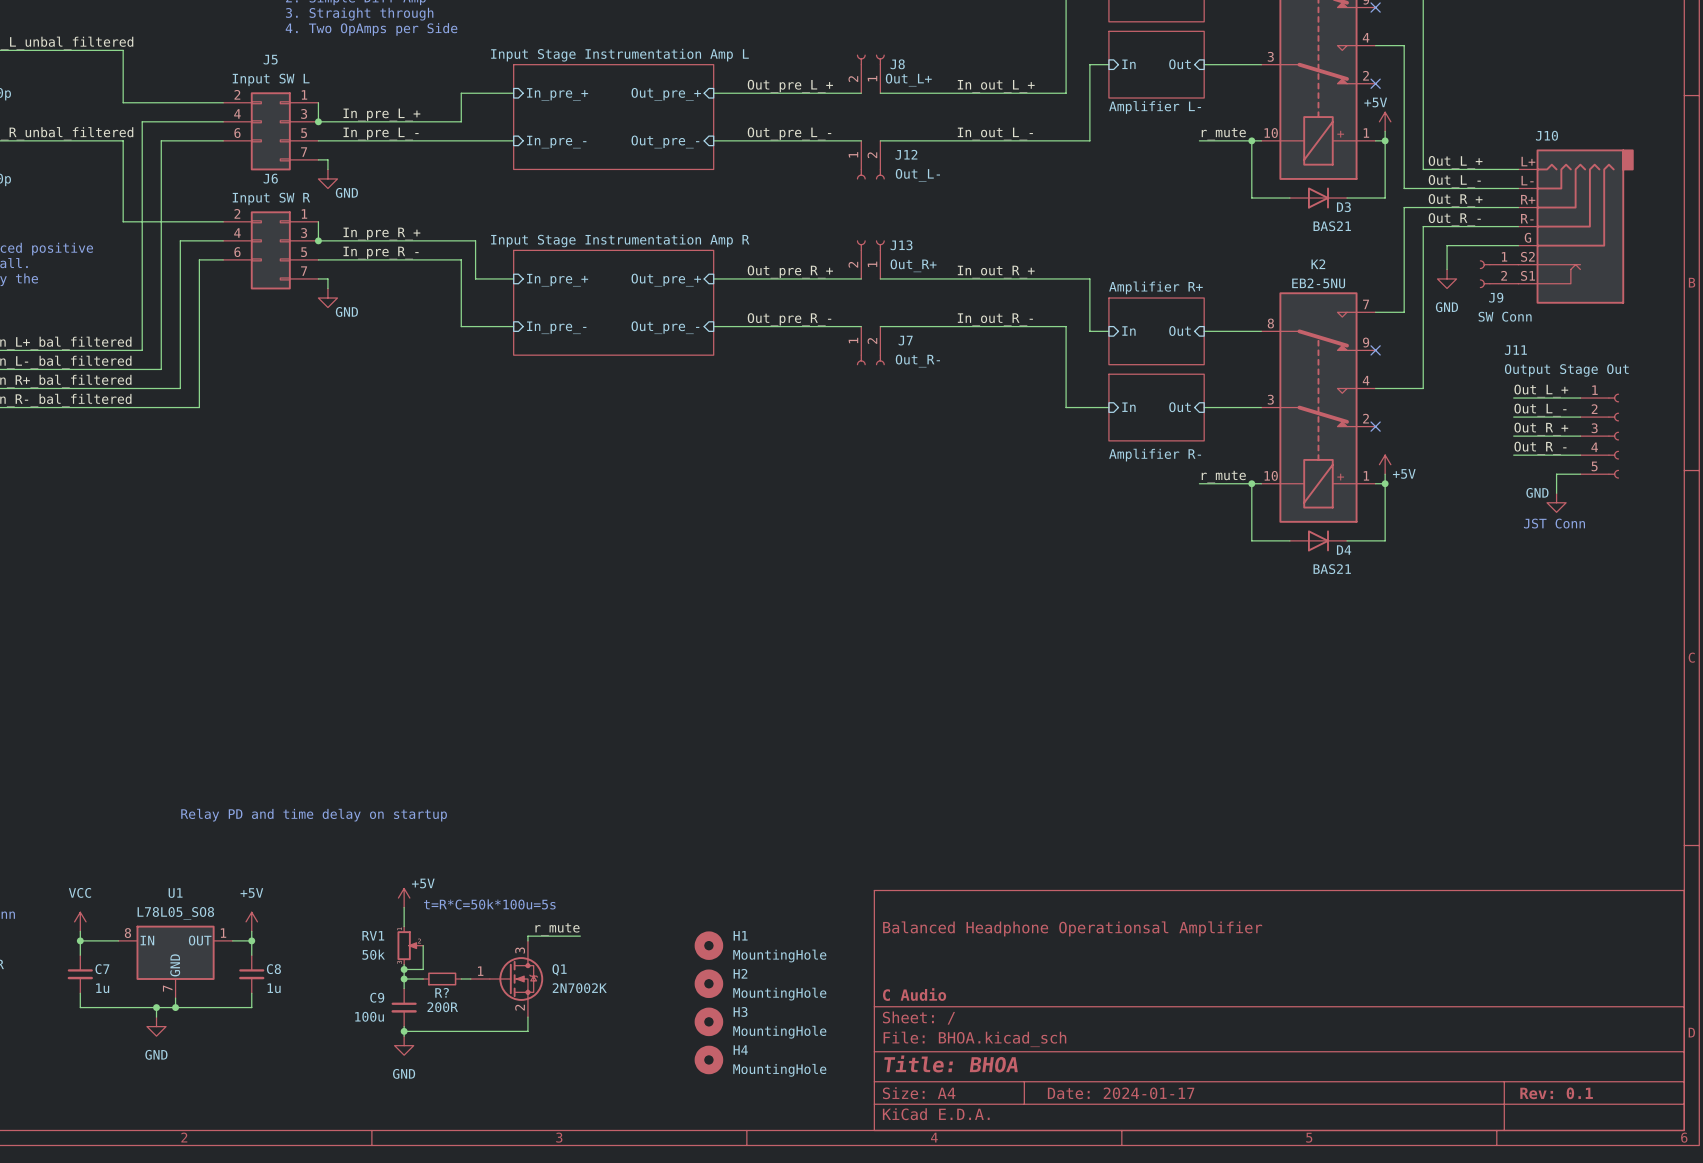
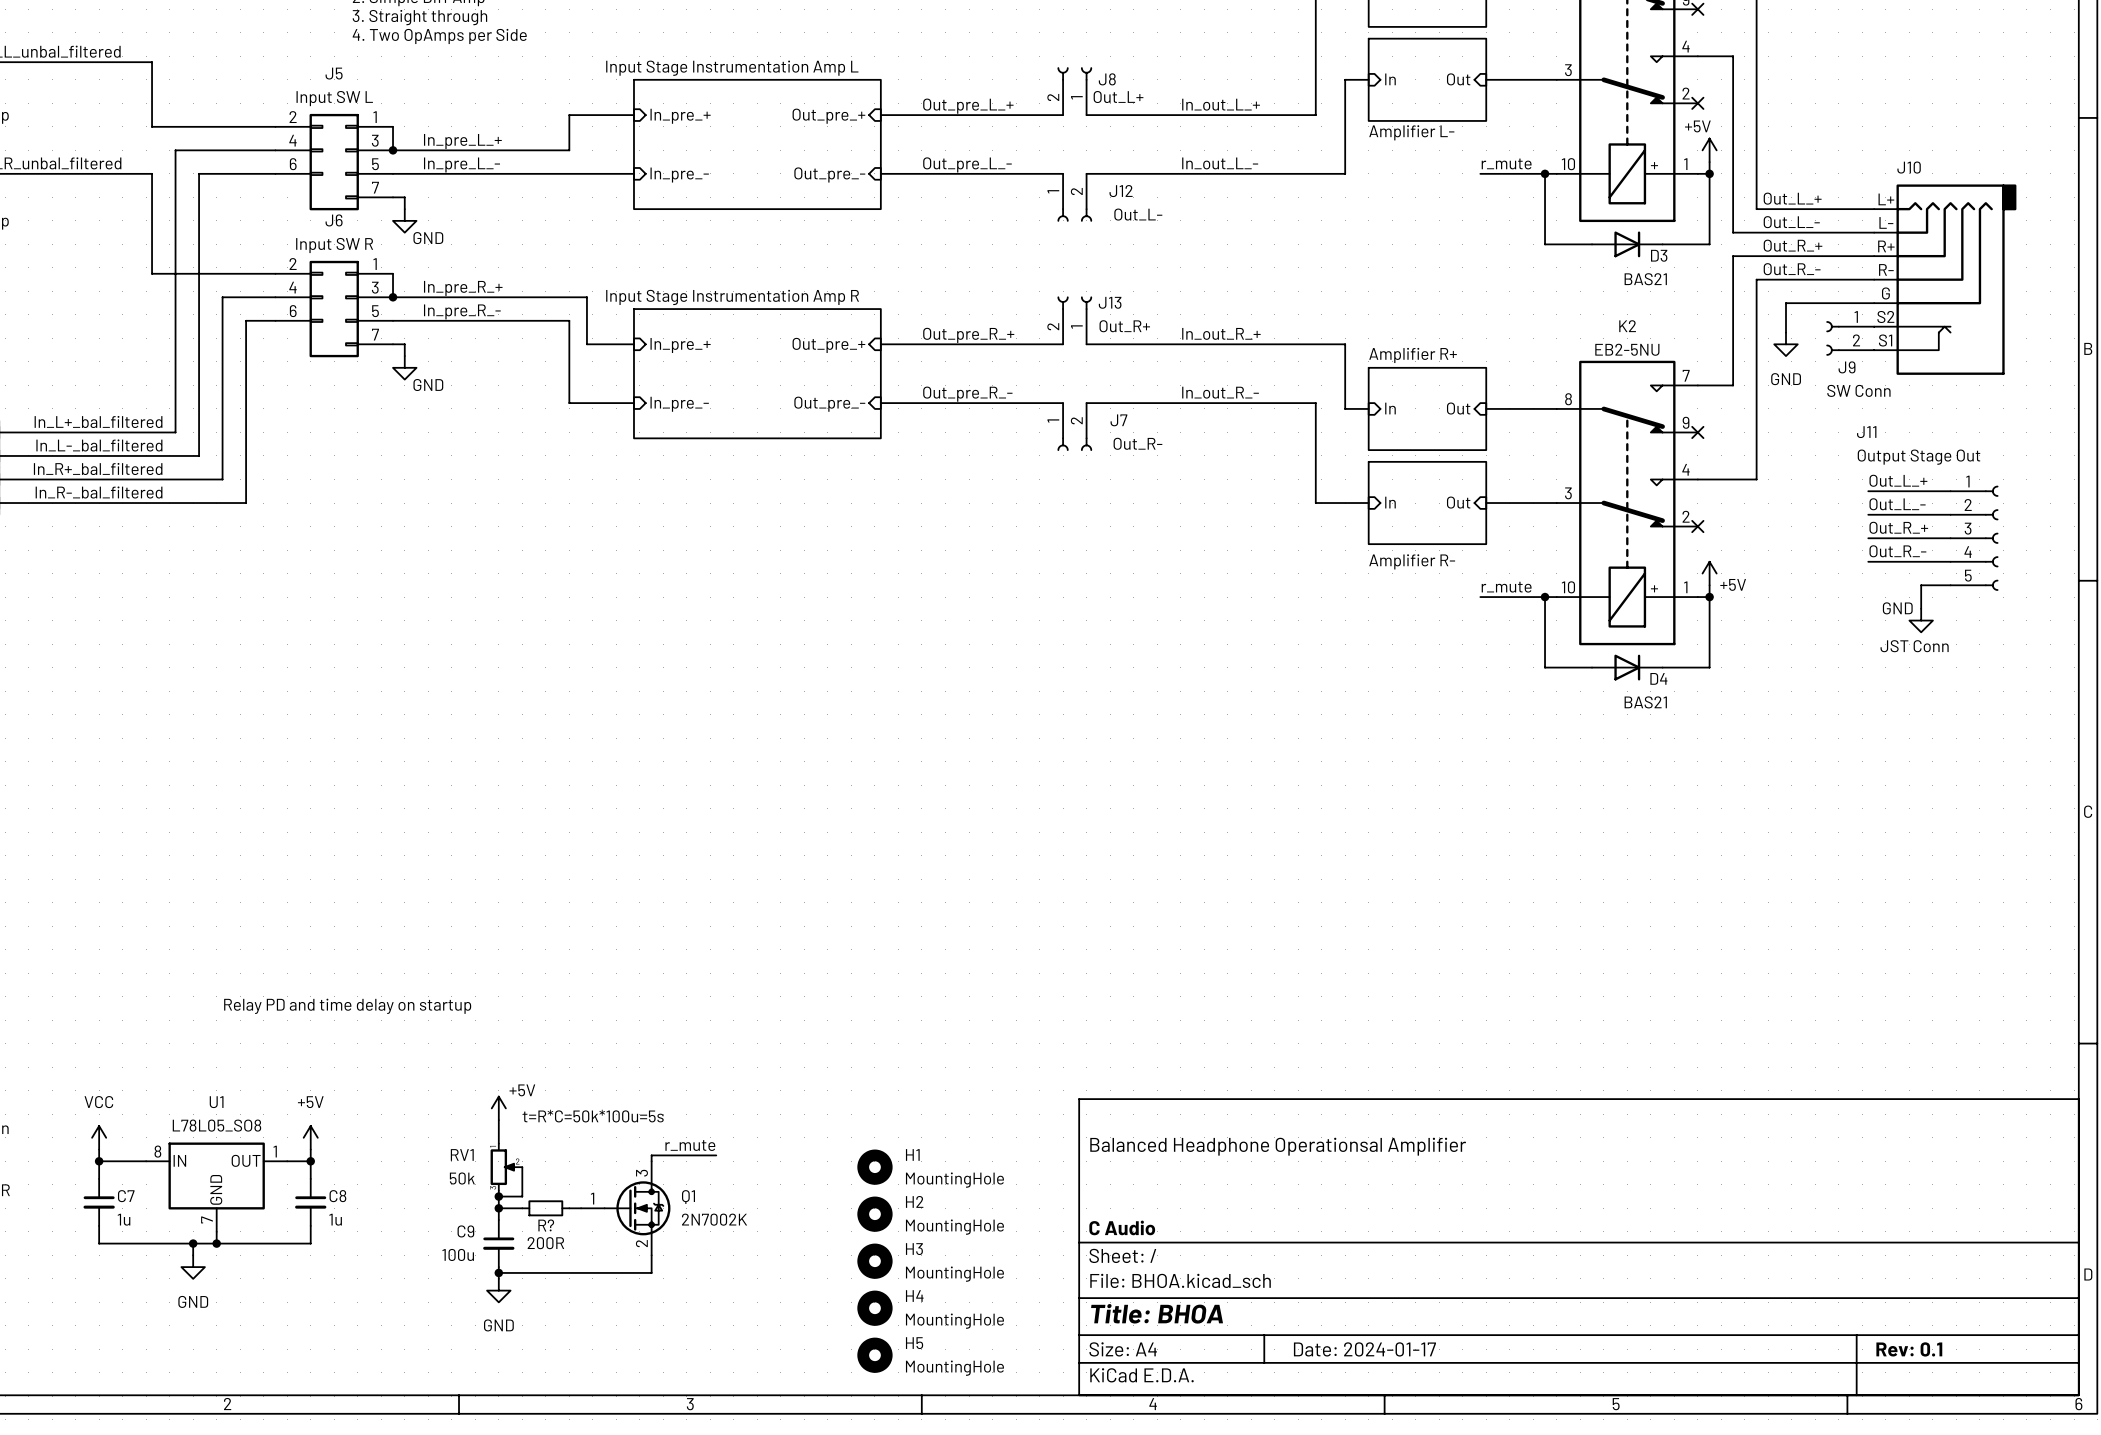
H5: none -> MountingHole (874, 1355)

